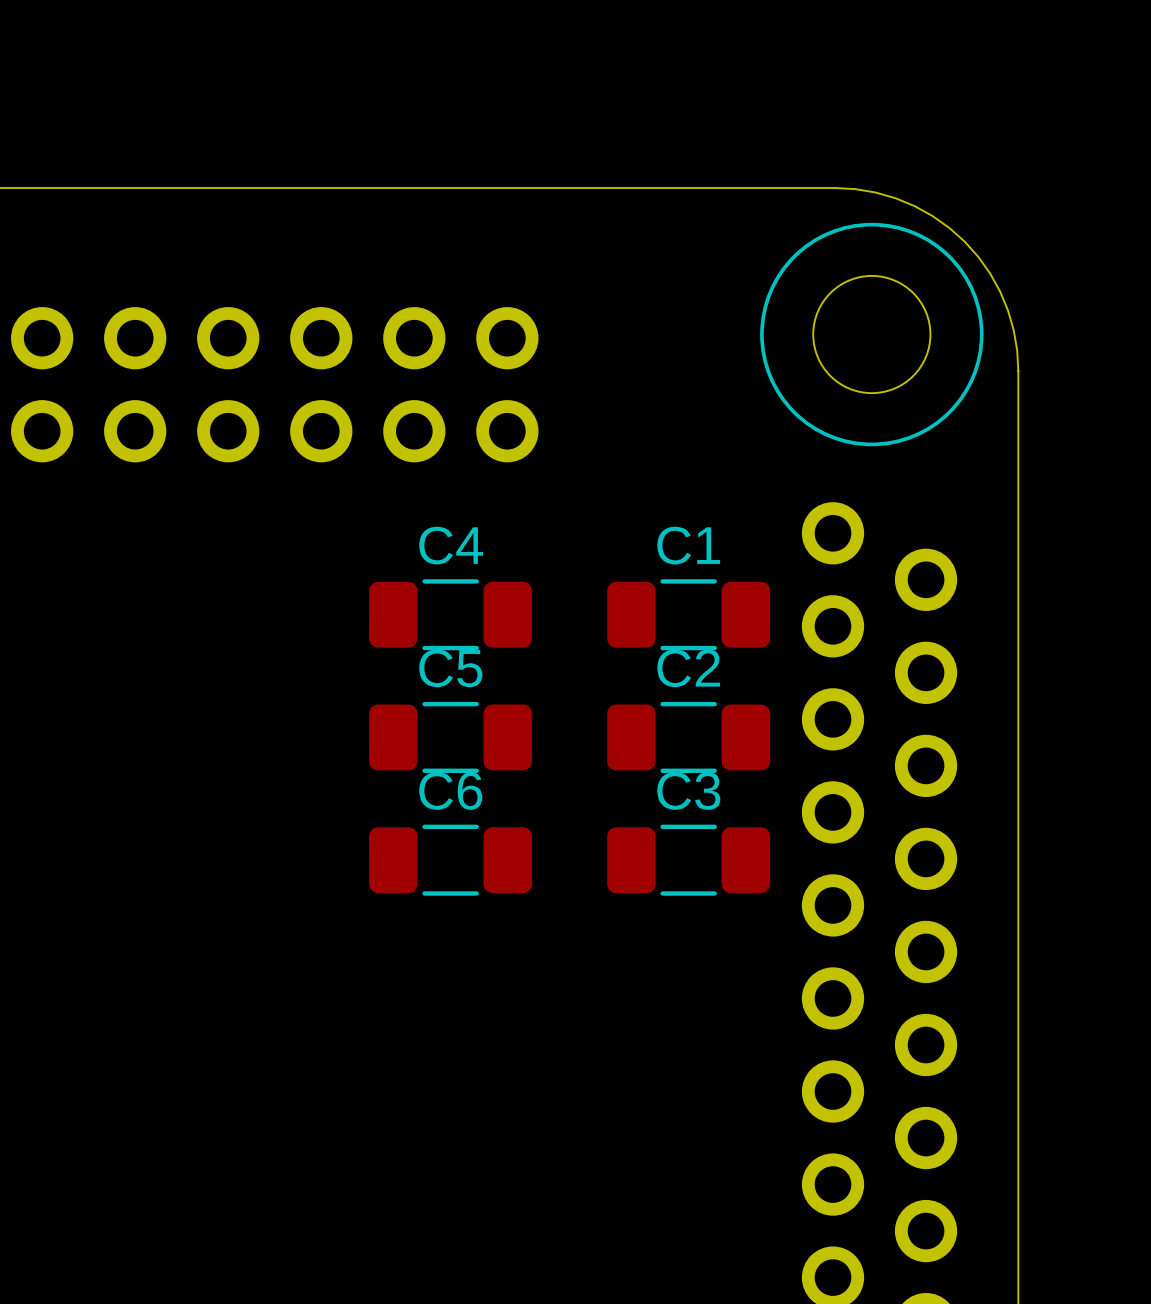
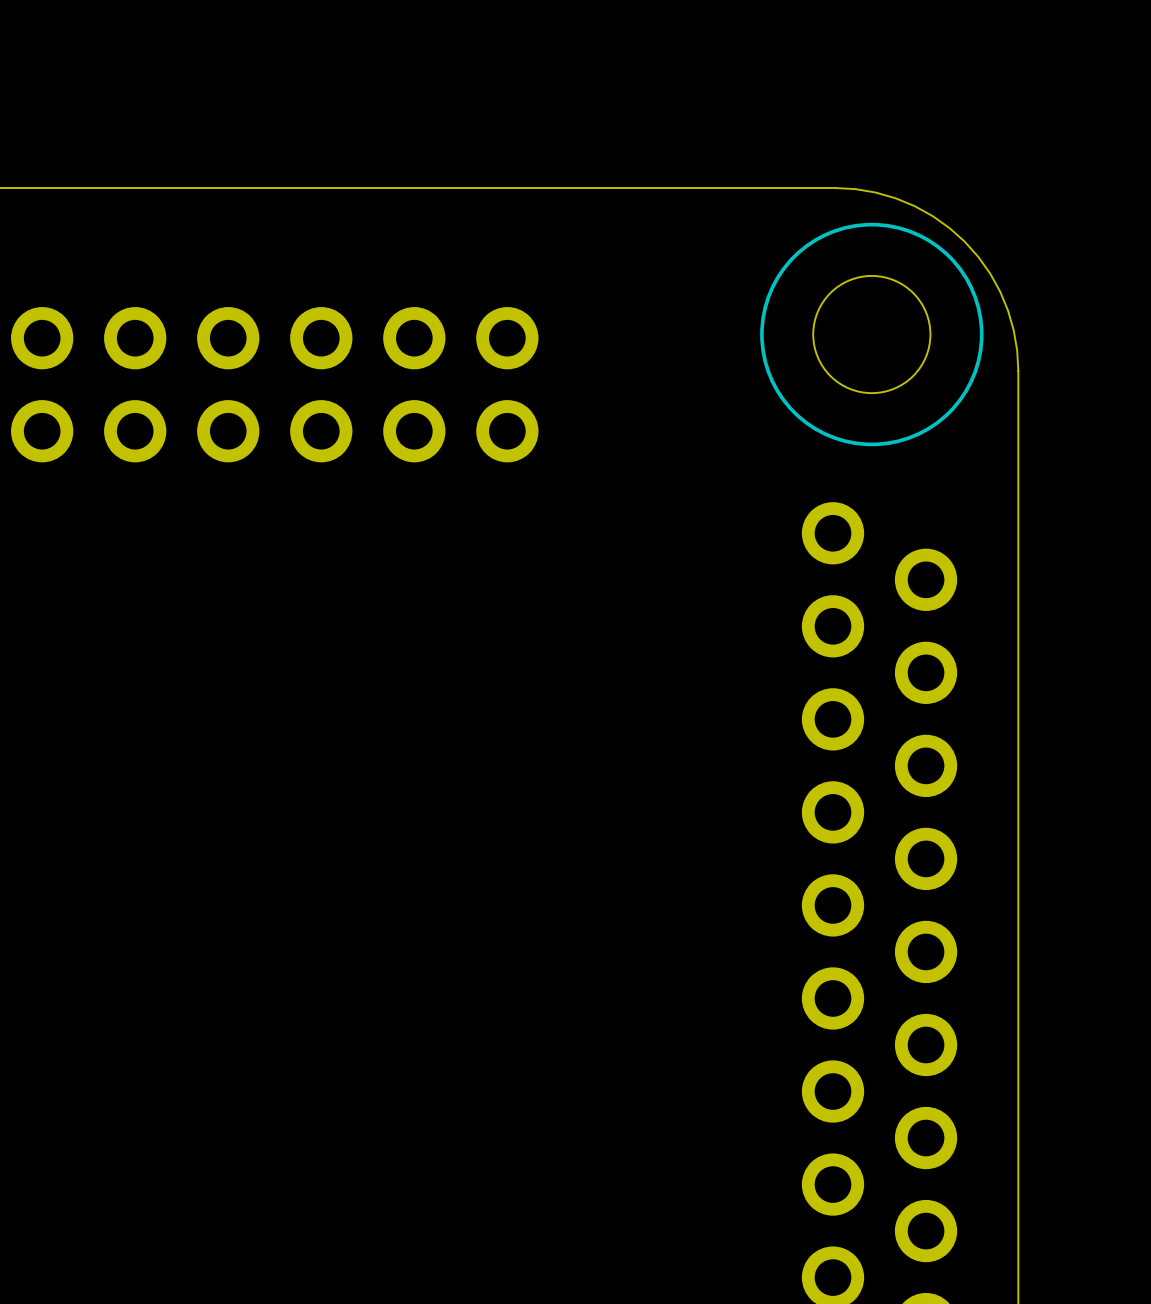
C4: (450, 614) -> none
C1: (688, 614) -> none
C5: (450, 737) -> none
C2: (688, 737) -> none
C6: (450, 860) -> none
C3: (688, 860) -> none

